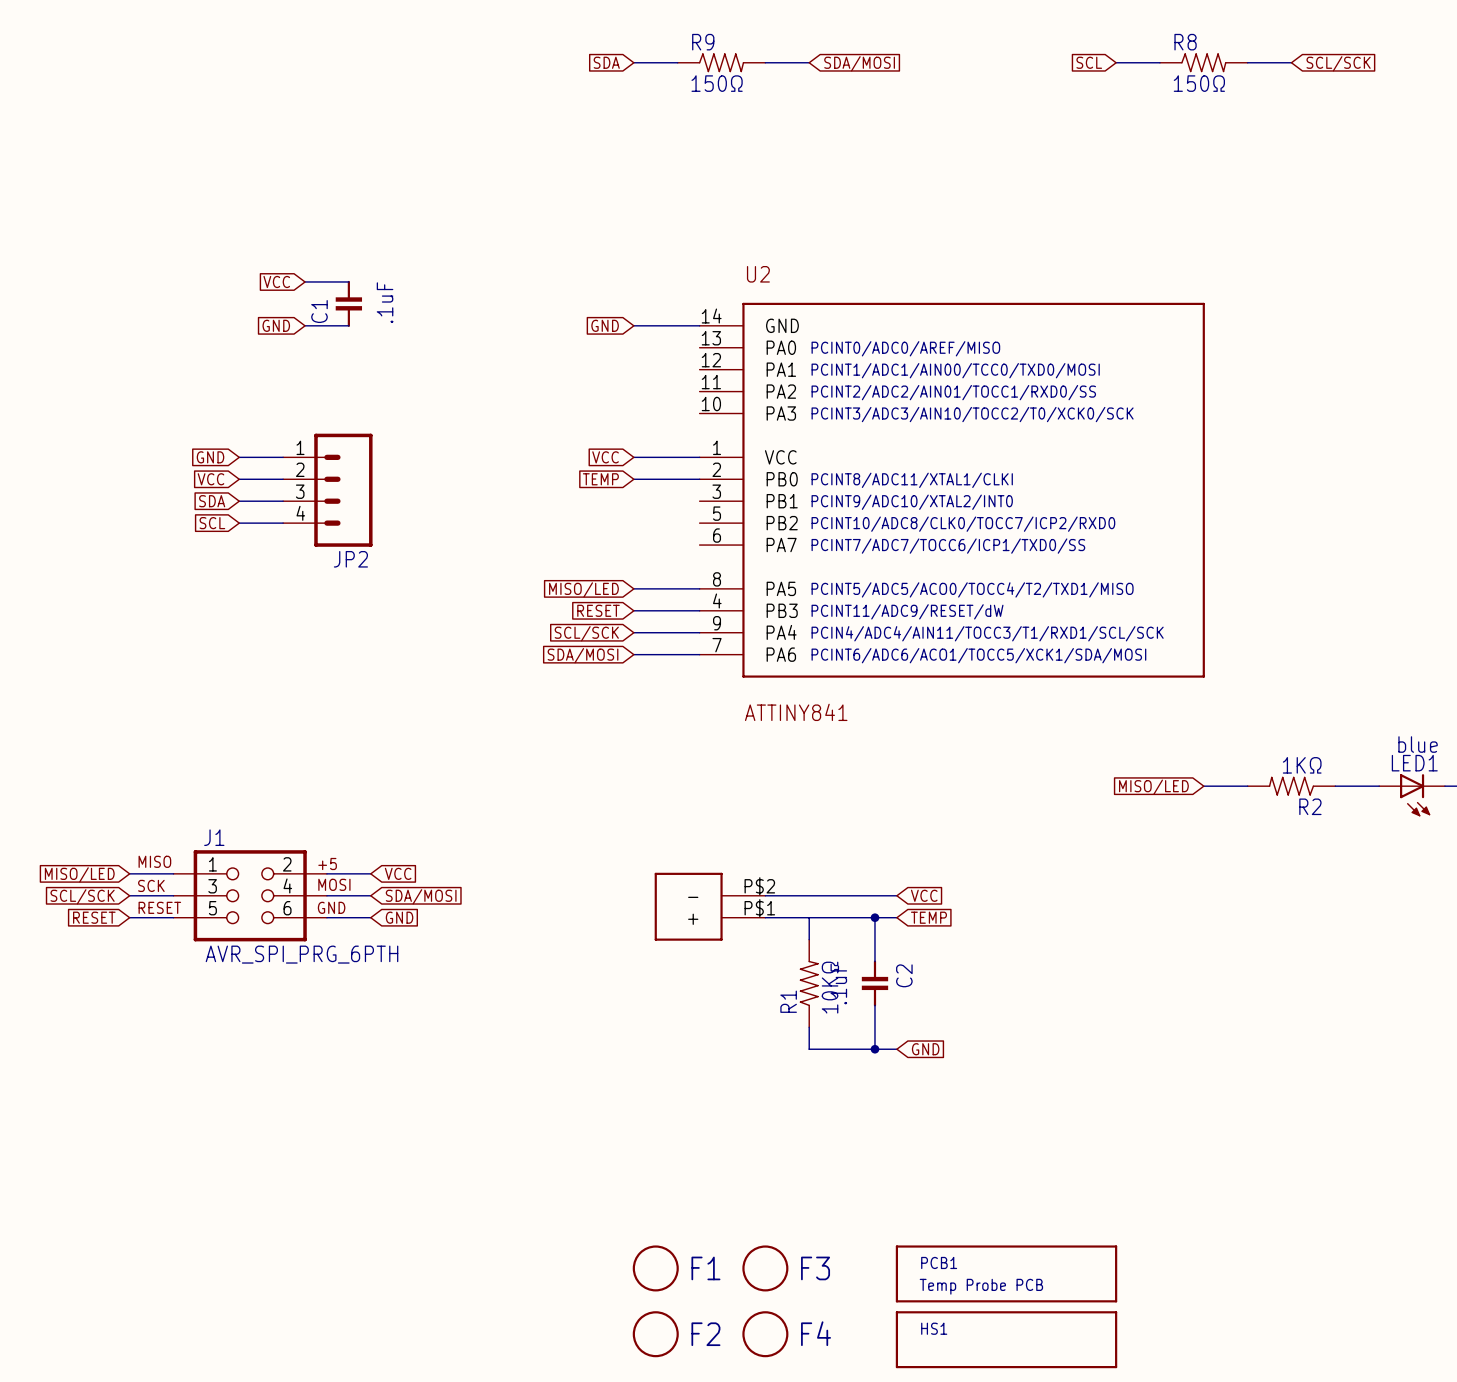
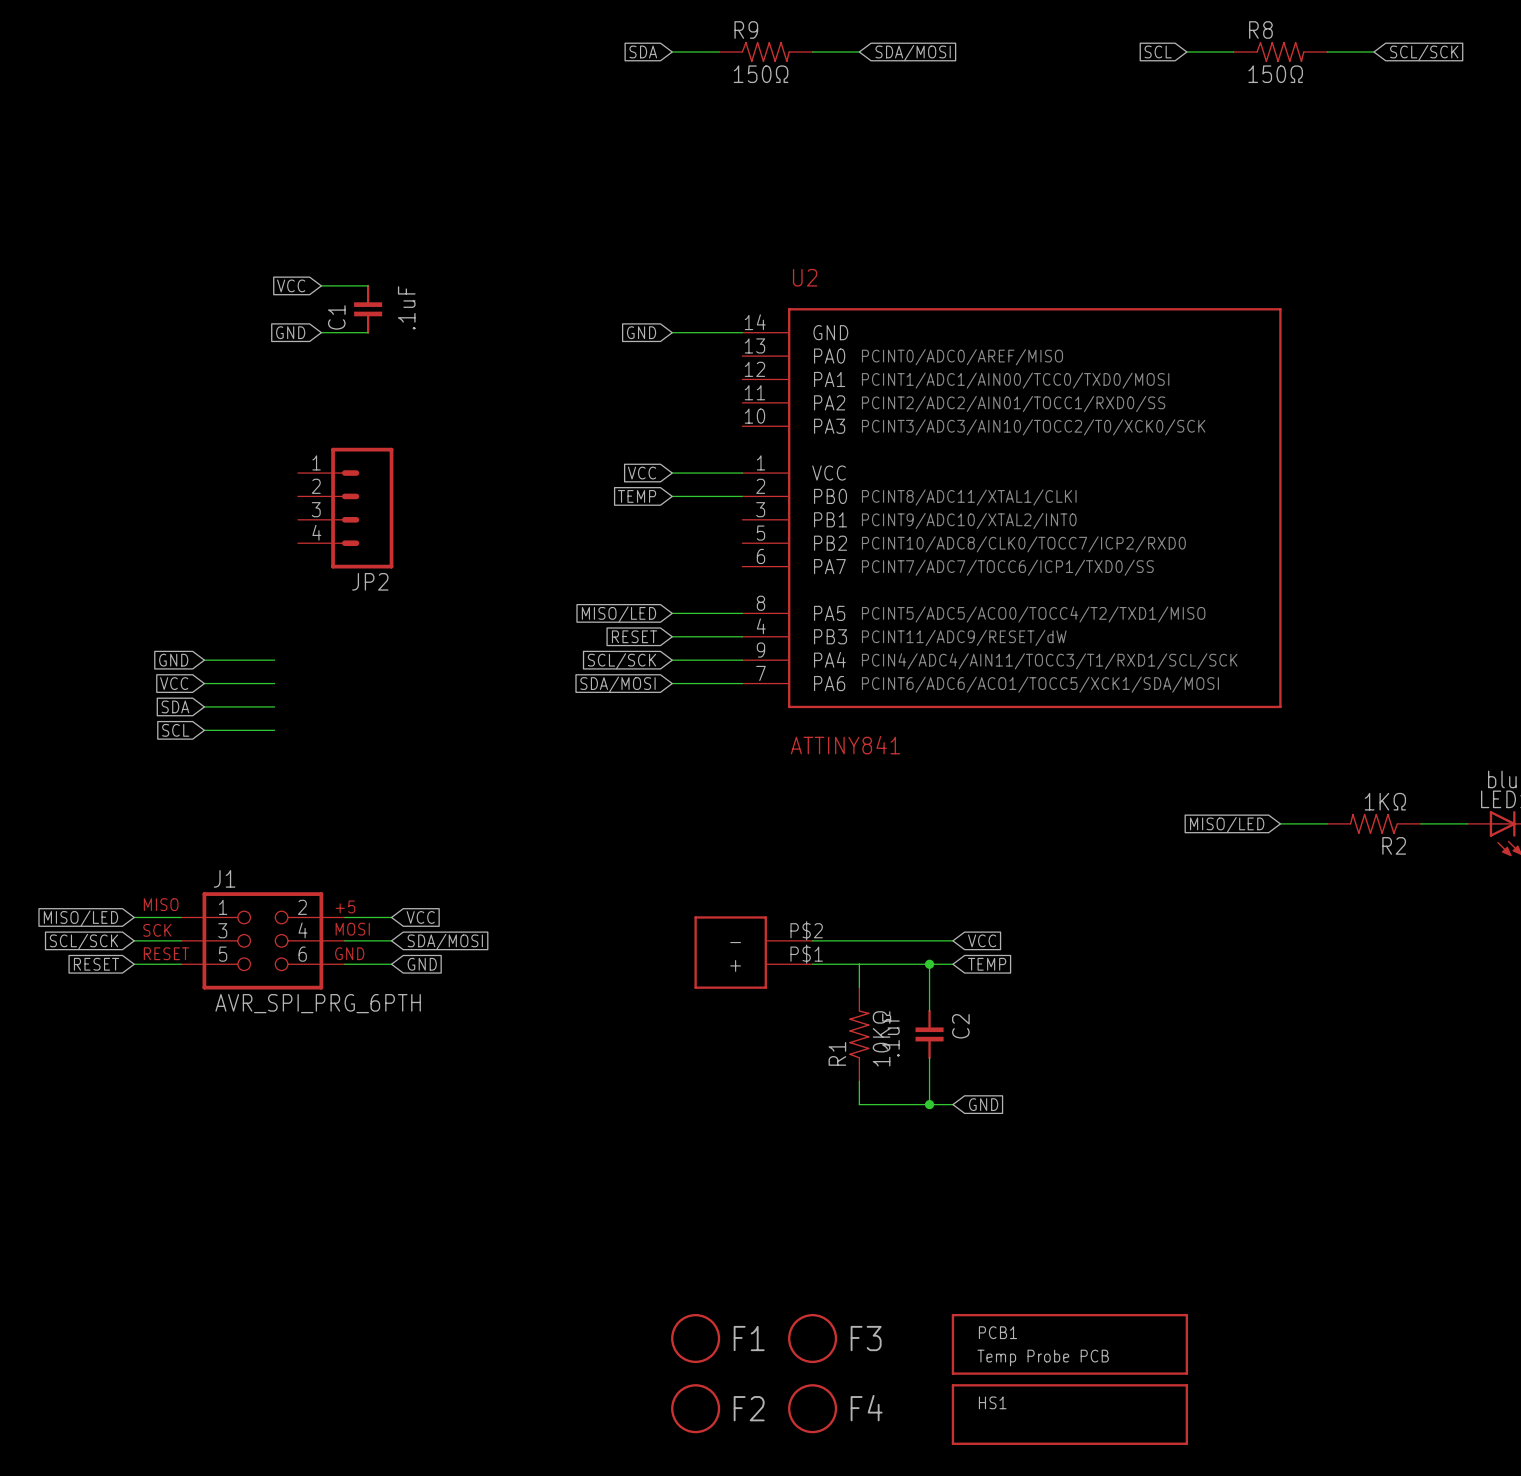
global label position: GND (210, 457) -> GND (173, 660)
wire: (239, 457) (283, 457) -> none
global label position: VCC (210, 479) -> VCC (174, 683)
wire: (239, 479) (283, 479) -> none
global label position: SDA (212, 501) -> SDA (175, 706)
wire: (239, 501) (283, 501) -> none
global label position: SCL (212, 523) -> SCL (175, 730)
wire: (239, 523) (283, 523) -> none
wire: none -> (204, 660) (274, 660)
wire: none -> (204, 683) (274, 683)
wire: none -> (204, 706) (274, 706)
wire: none -> (204, 730) (274, 730)

